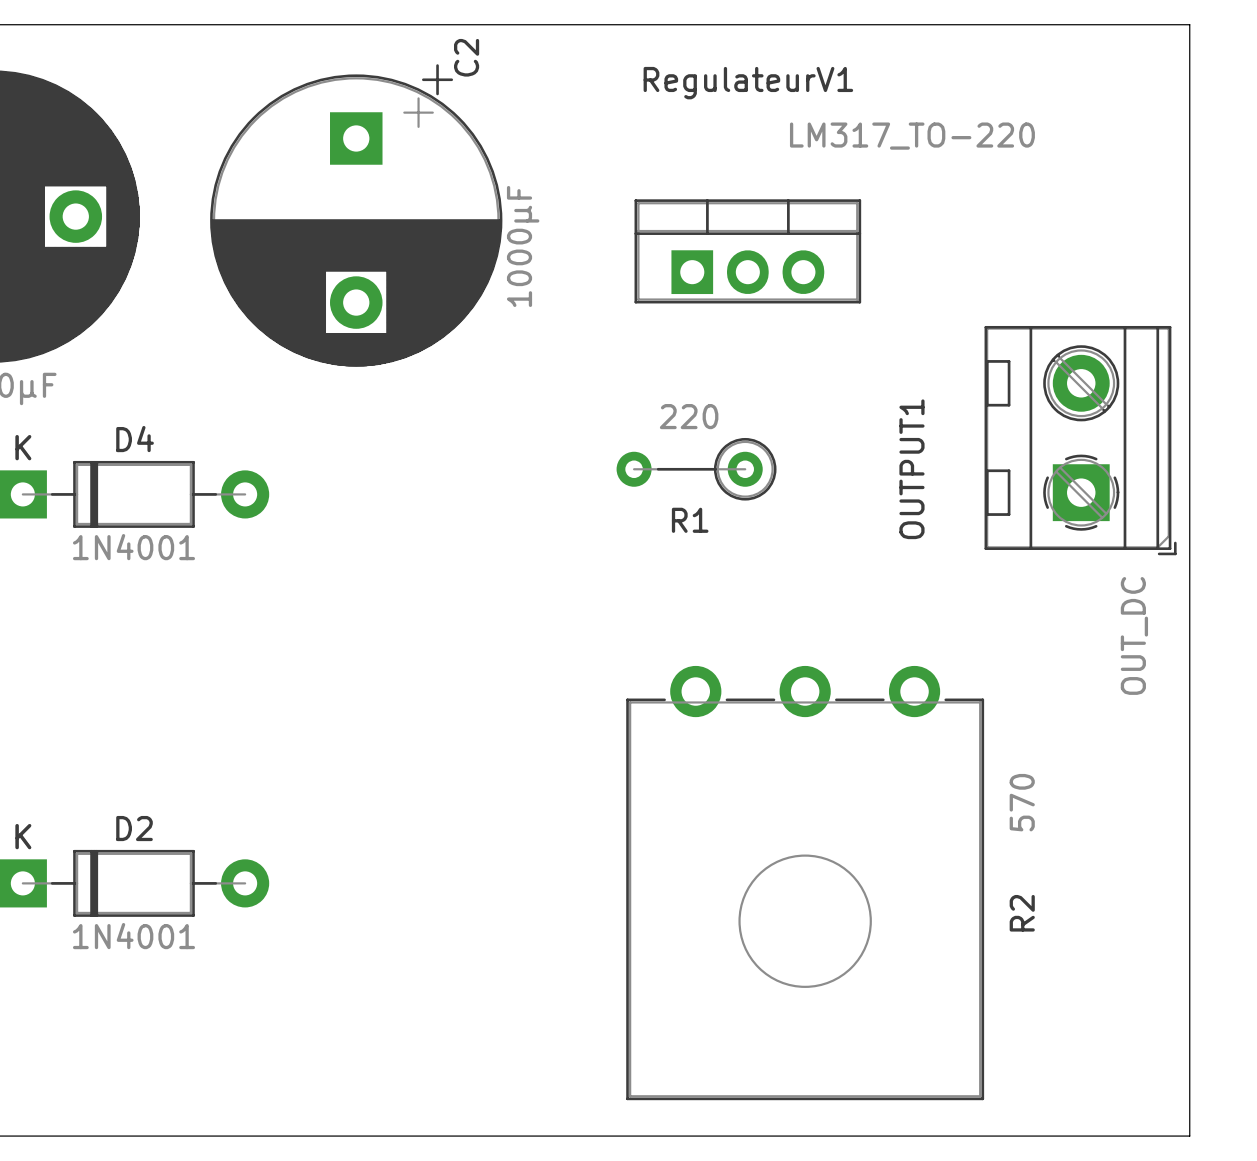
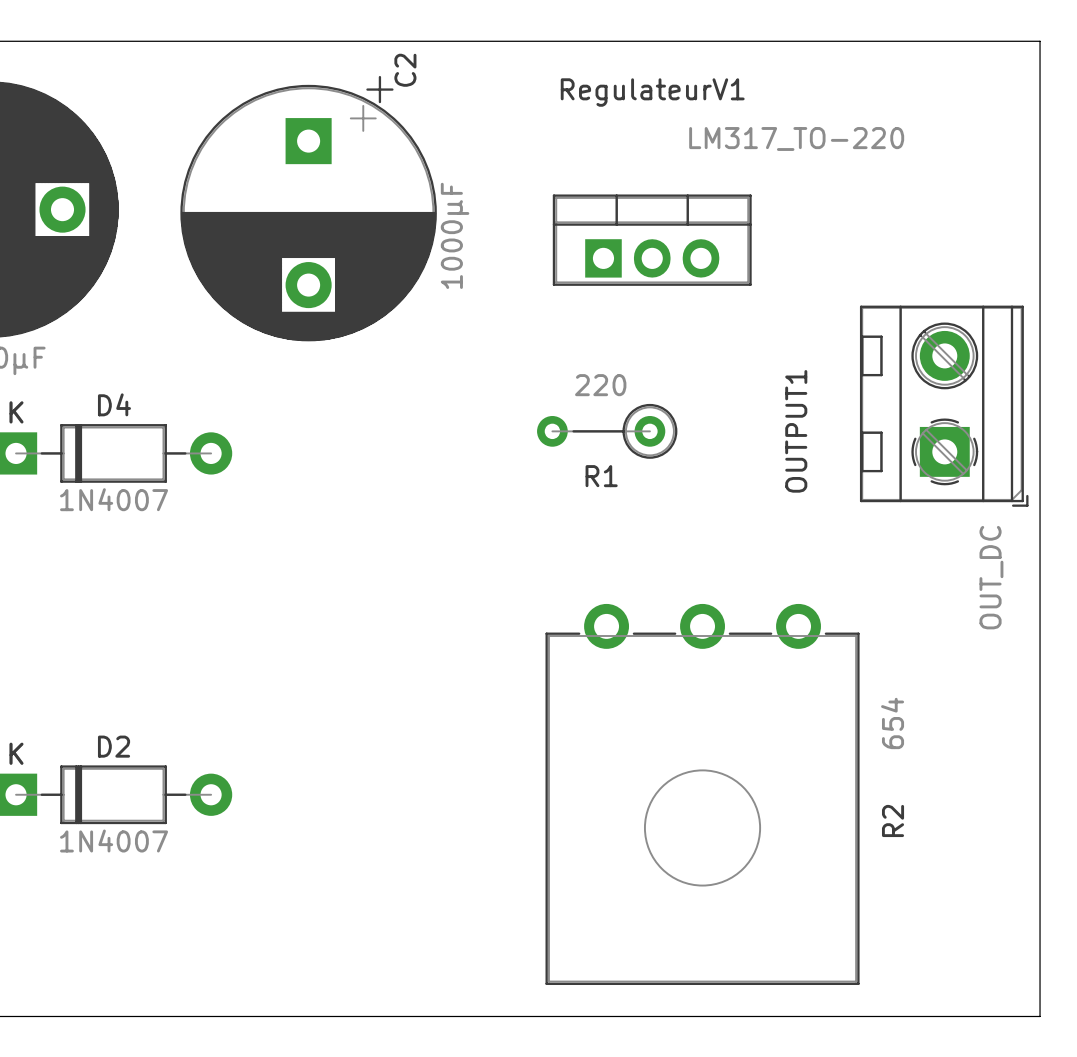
D4 value: 1N4001 (133, 547) -> 1N4007 (114, 499)
R2 value: 570 (1022, 802) -> 654 (892, 723)
D2 value: 1N4001 (133, 936) -> 1N4007 (114, 841)

